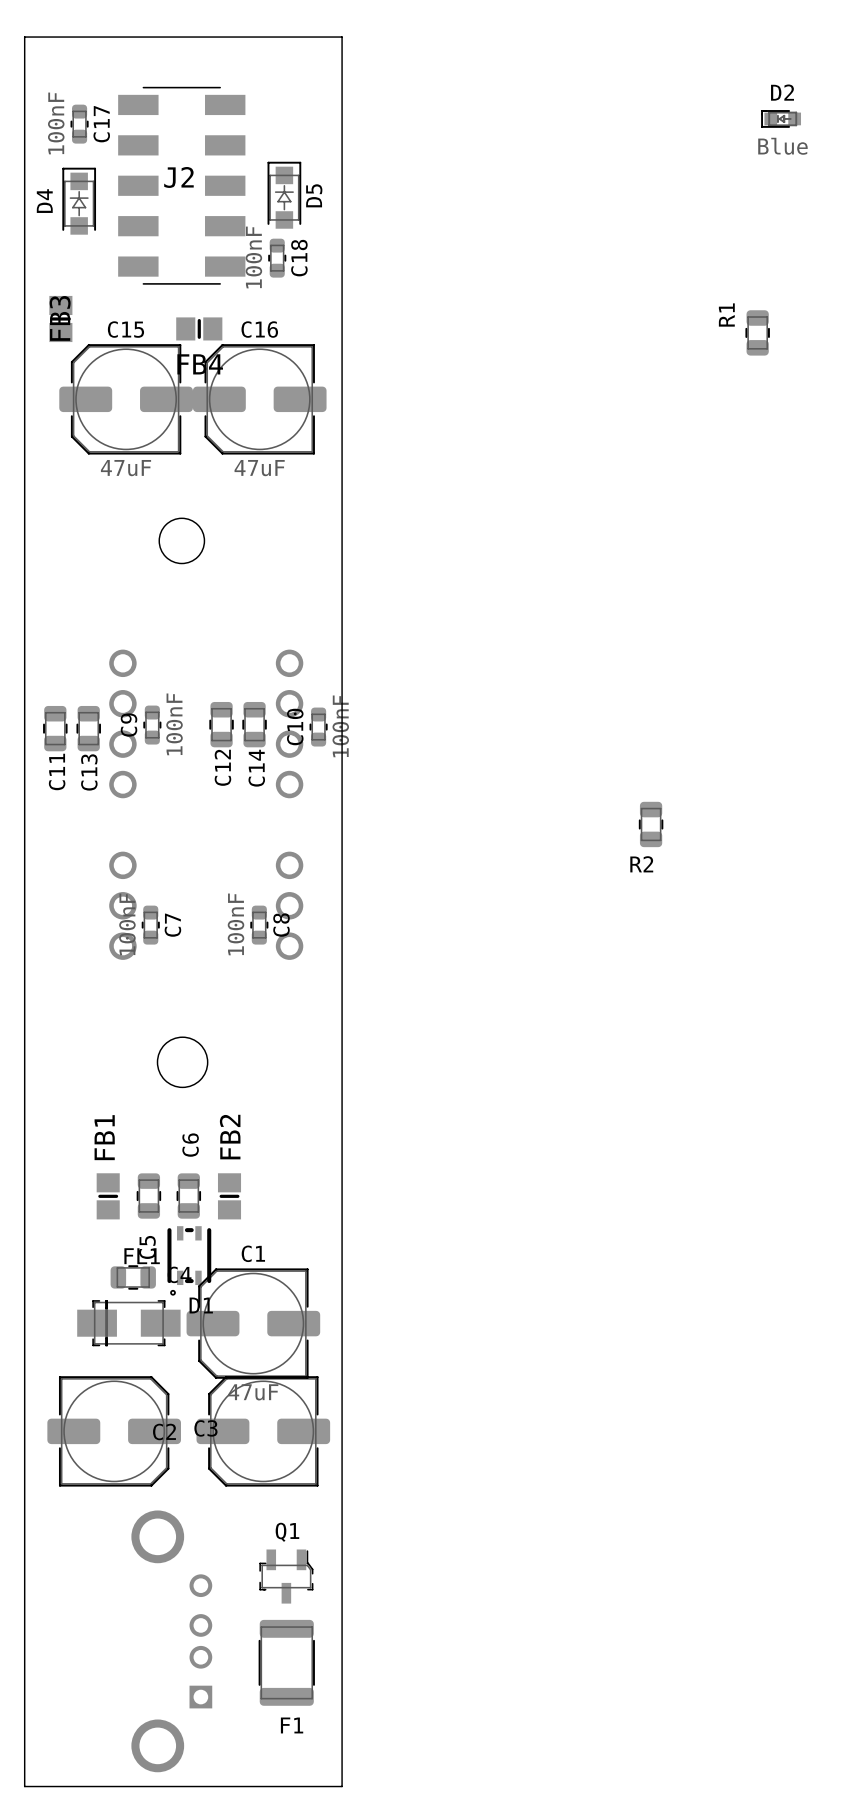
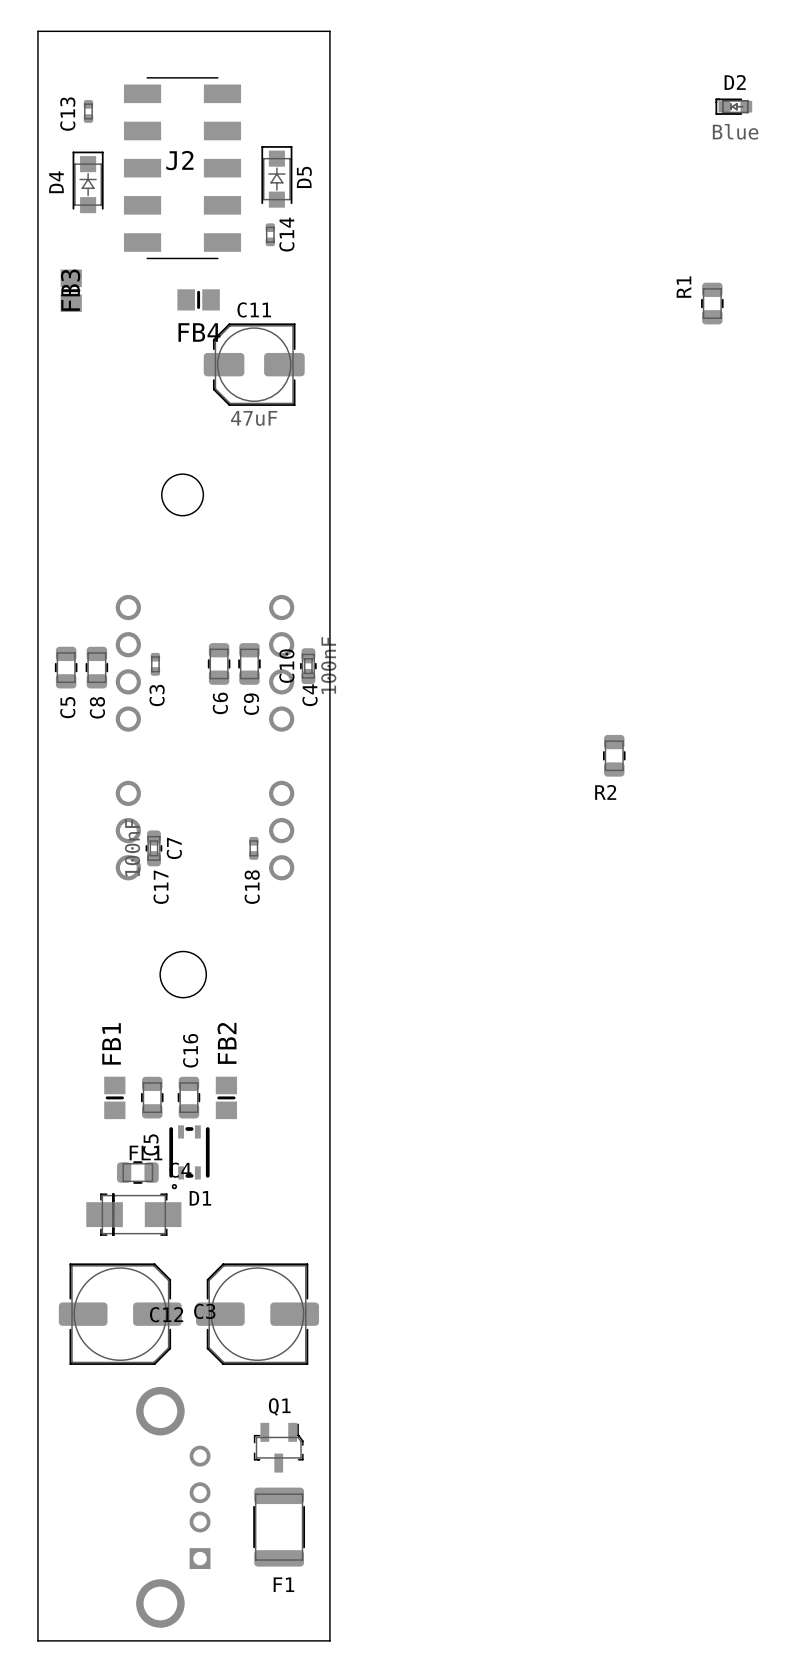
C17 footprint: [70, 104, 89, 144] -> [149, 836, 159, 860]
C17 value: 100nF (56, 123) -> none
C13: none -> (88, 111)
C17 name position: C17 (101, 124) -> C17 (161, 887)
C18 footprint: [268, 238, 287, 278] -> [249, 836, 259, 860]
C18 value: 100nF (253, 257) -> none
C14: none -> (270, 234)
C18 name position: C18 (299, 258) -> C18 (252, 887)
C15: 47uF (126, 399) -> none
C16: 47uF (259, 399) -> none
C11: none -> 47uF (254, 364)
C9: 100nF (152, 725) -> none
C3: none -> (155, 664)
C4: none -> (308, 666)
C12 name: C12 (222, 767) -> C6 (220, 703)
C14 name: C14 (256, 768) -> C9 (251, 704)
C11 name: C11 (57, 771) -> C5 (67, 707)
C13 name: C13 (89, 772) -> C8 (97, 707)
C8: 100nF (259, 925) -> none
C6 name: C6 (190, 1145) -> C16 (190, 1050)
C1: 47uF (253, 1323) -> none
C2 name: C2 (164, 1431) -> C12 (166, 1314)

